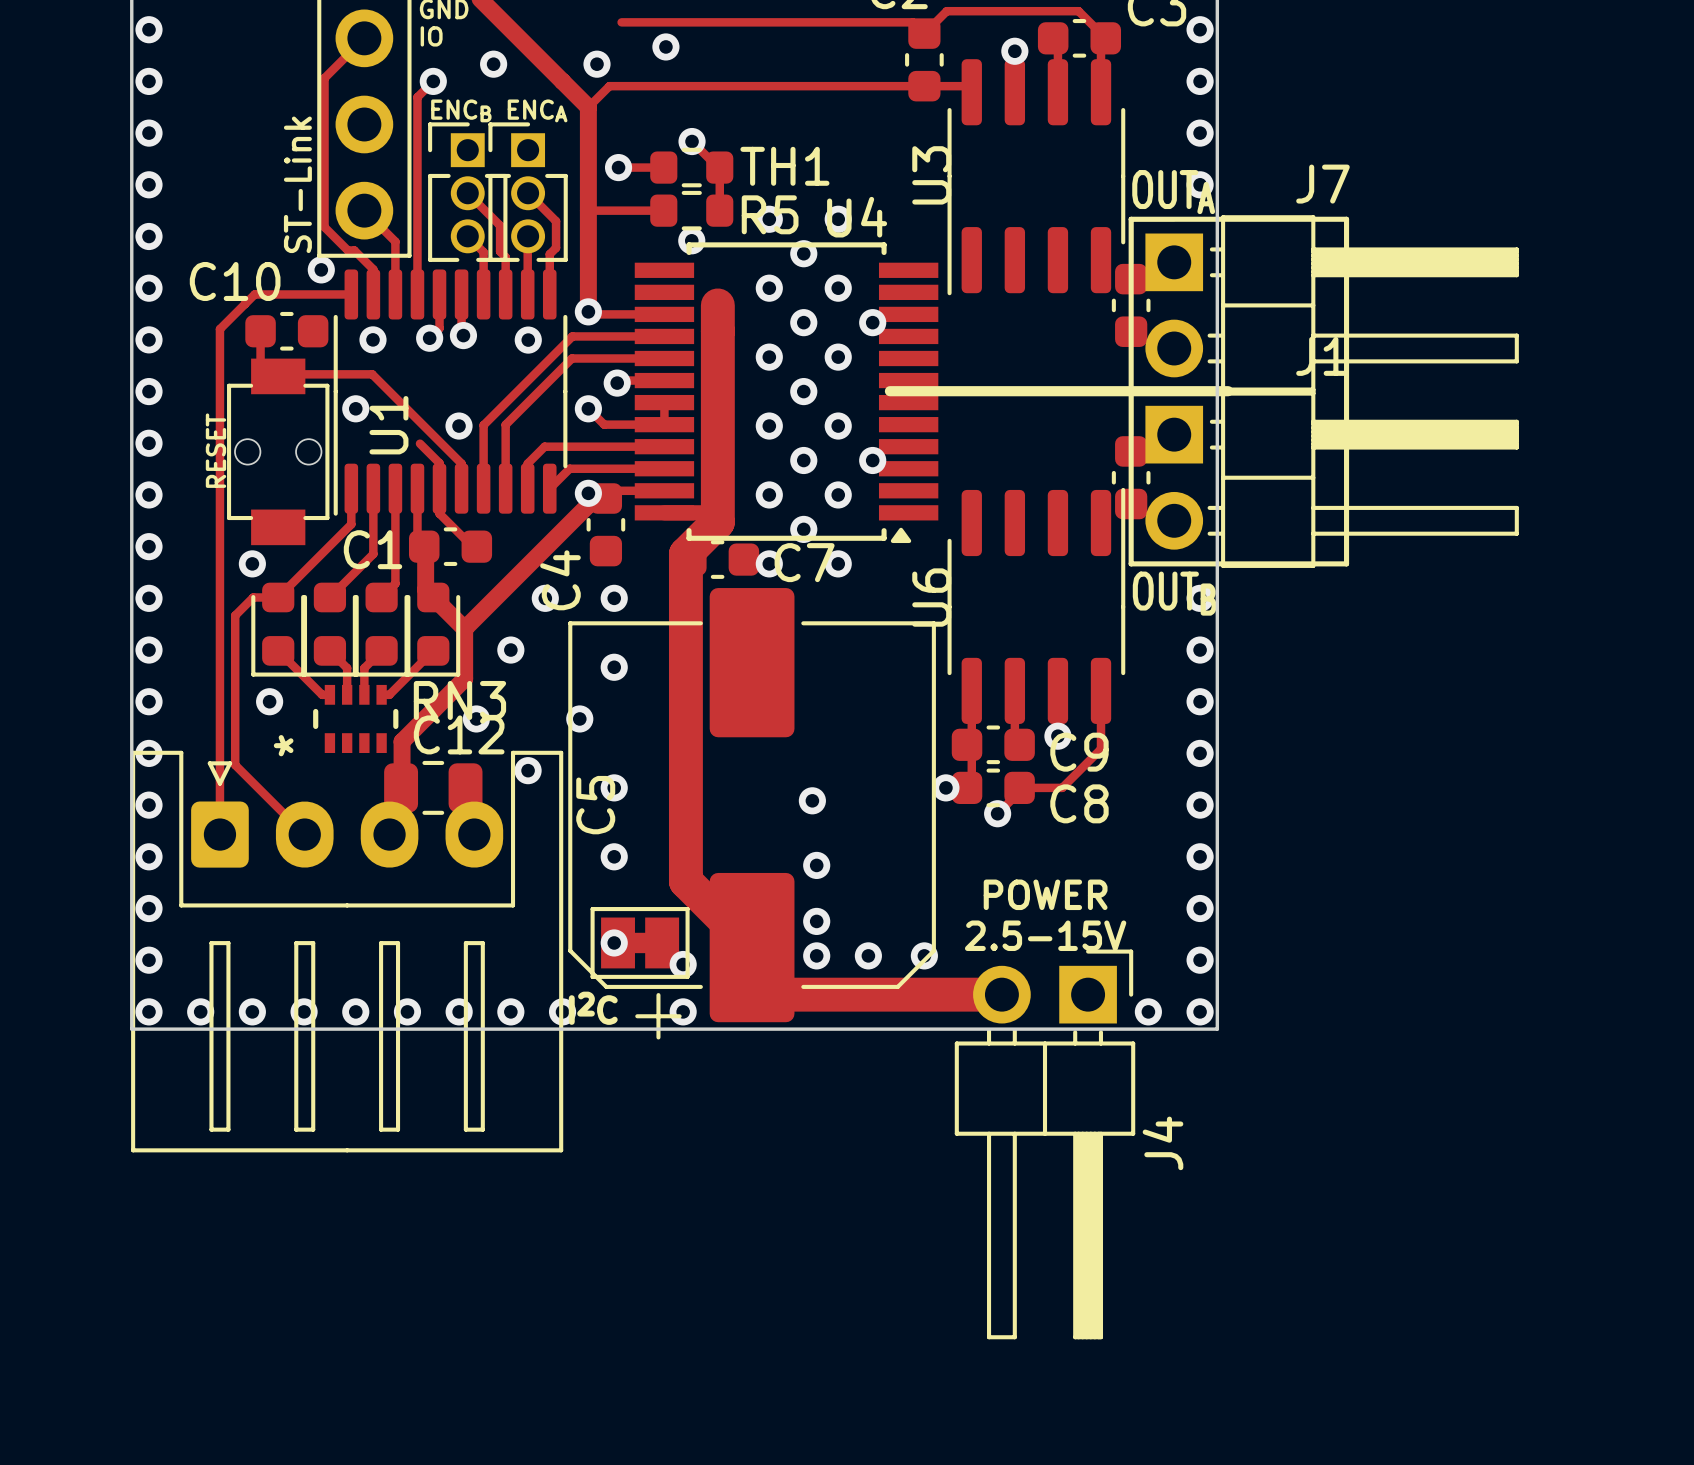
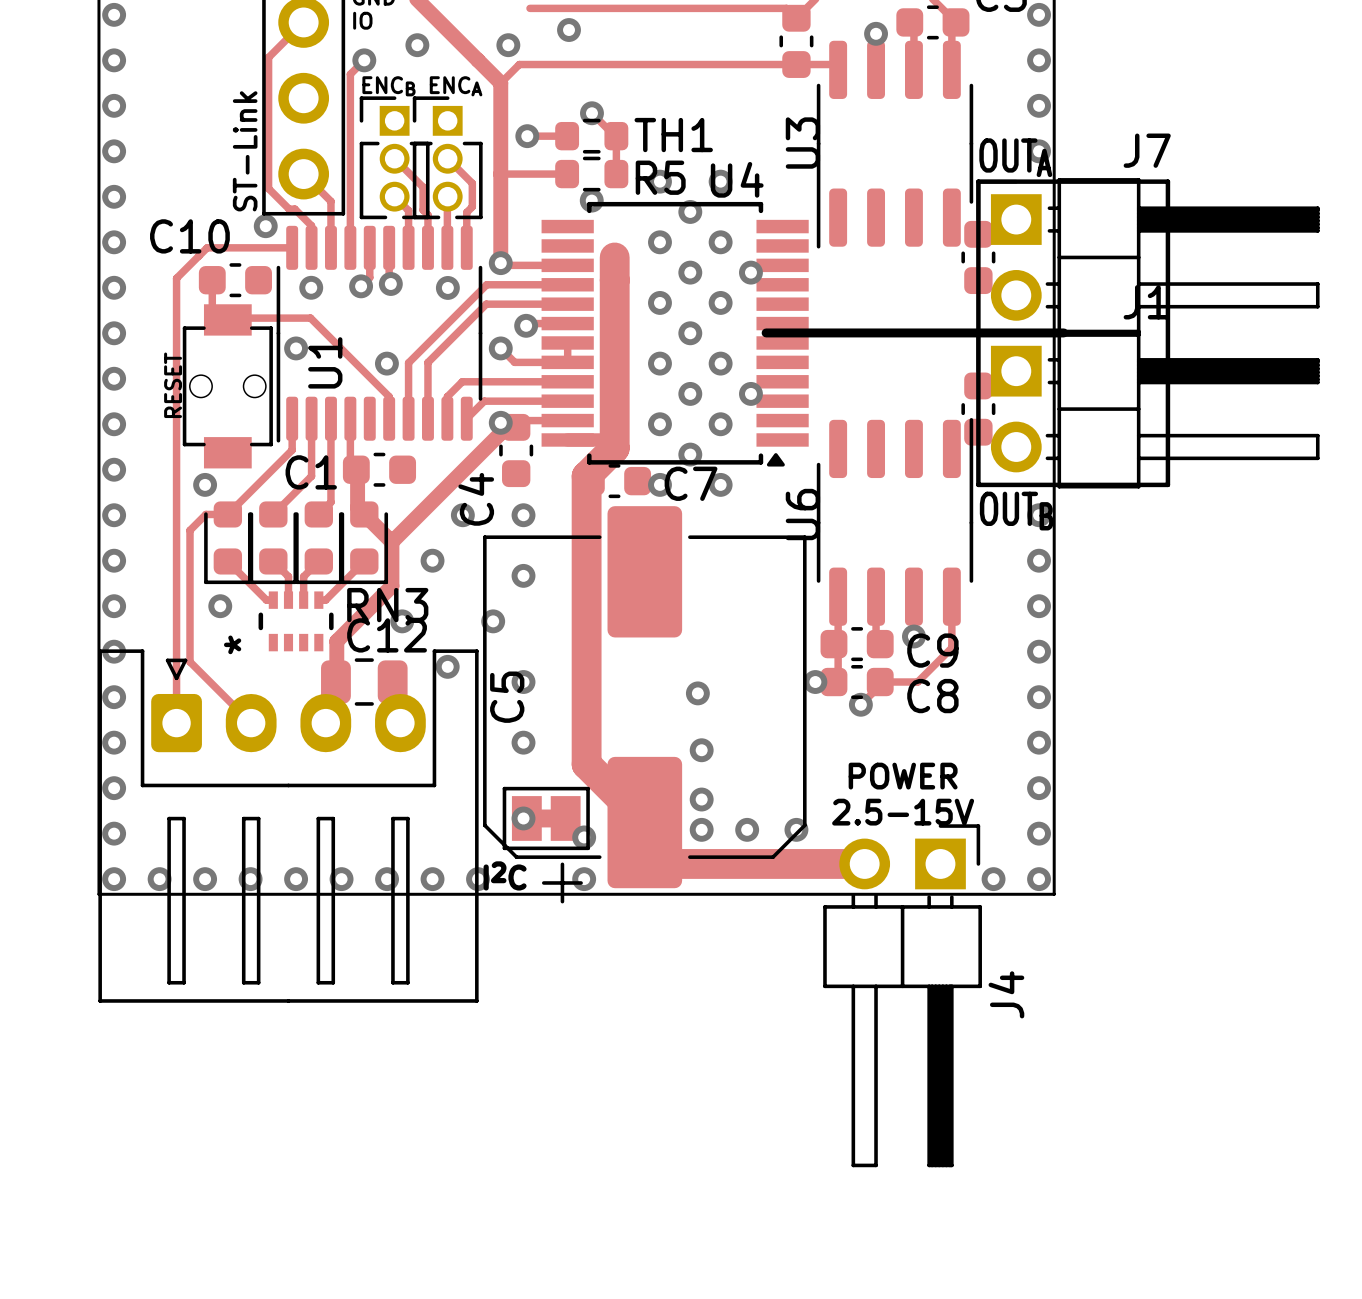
top track: (419, 443) (439, 463) (439, 513) (472, 546) (476, 546) -> none

